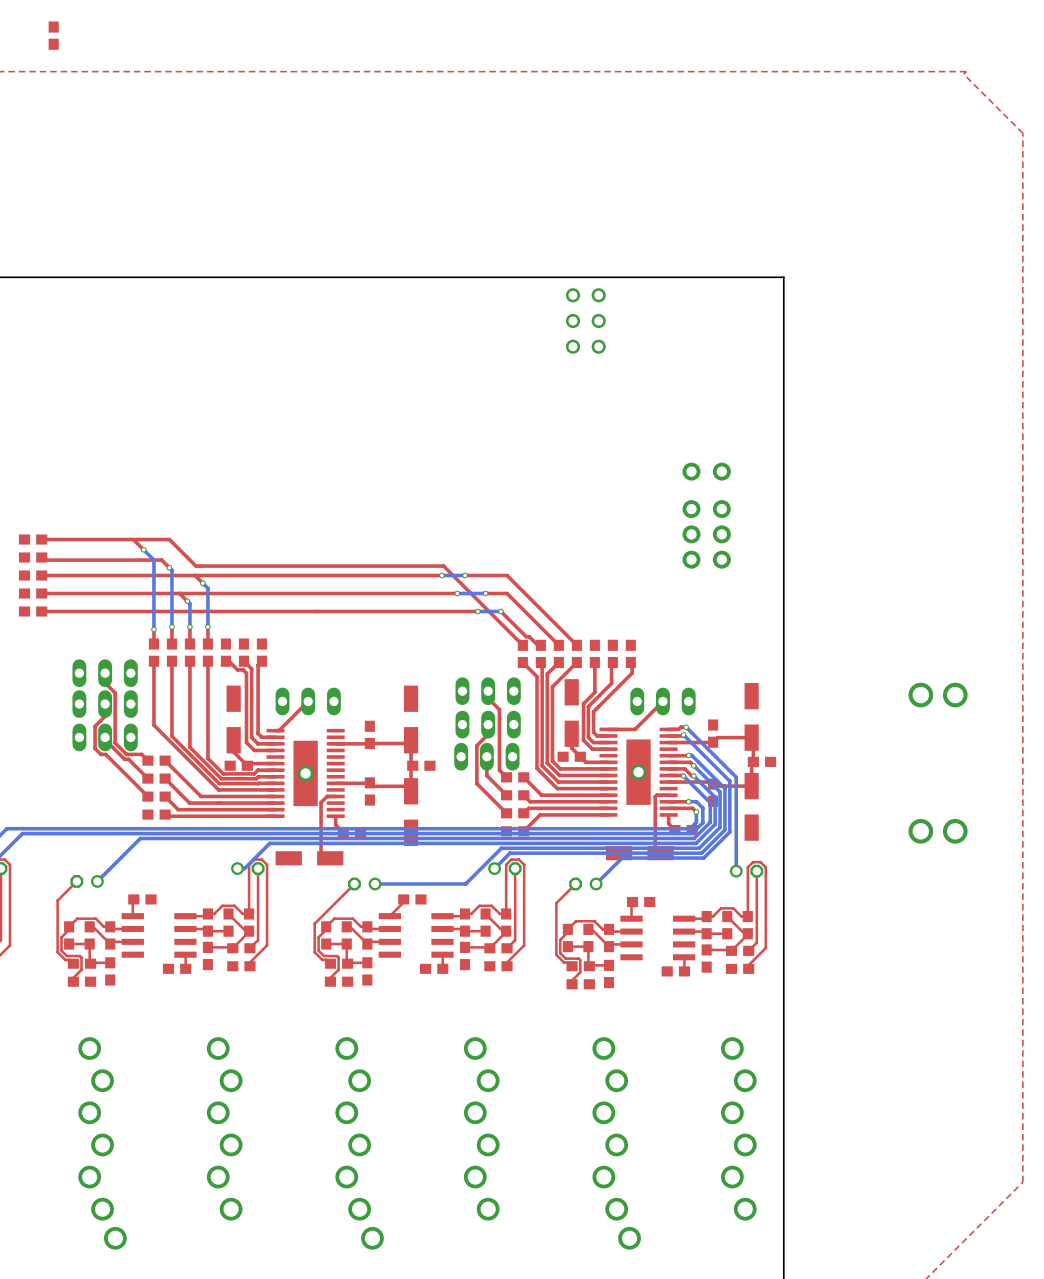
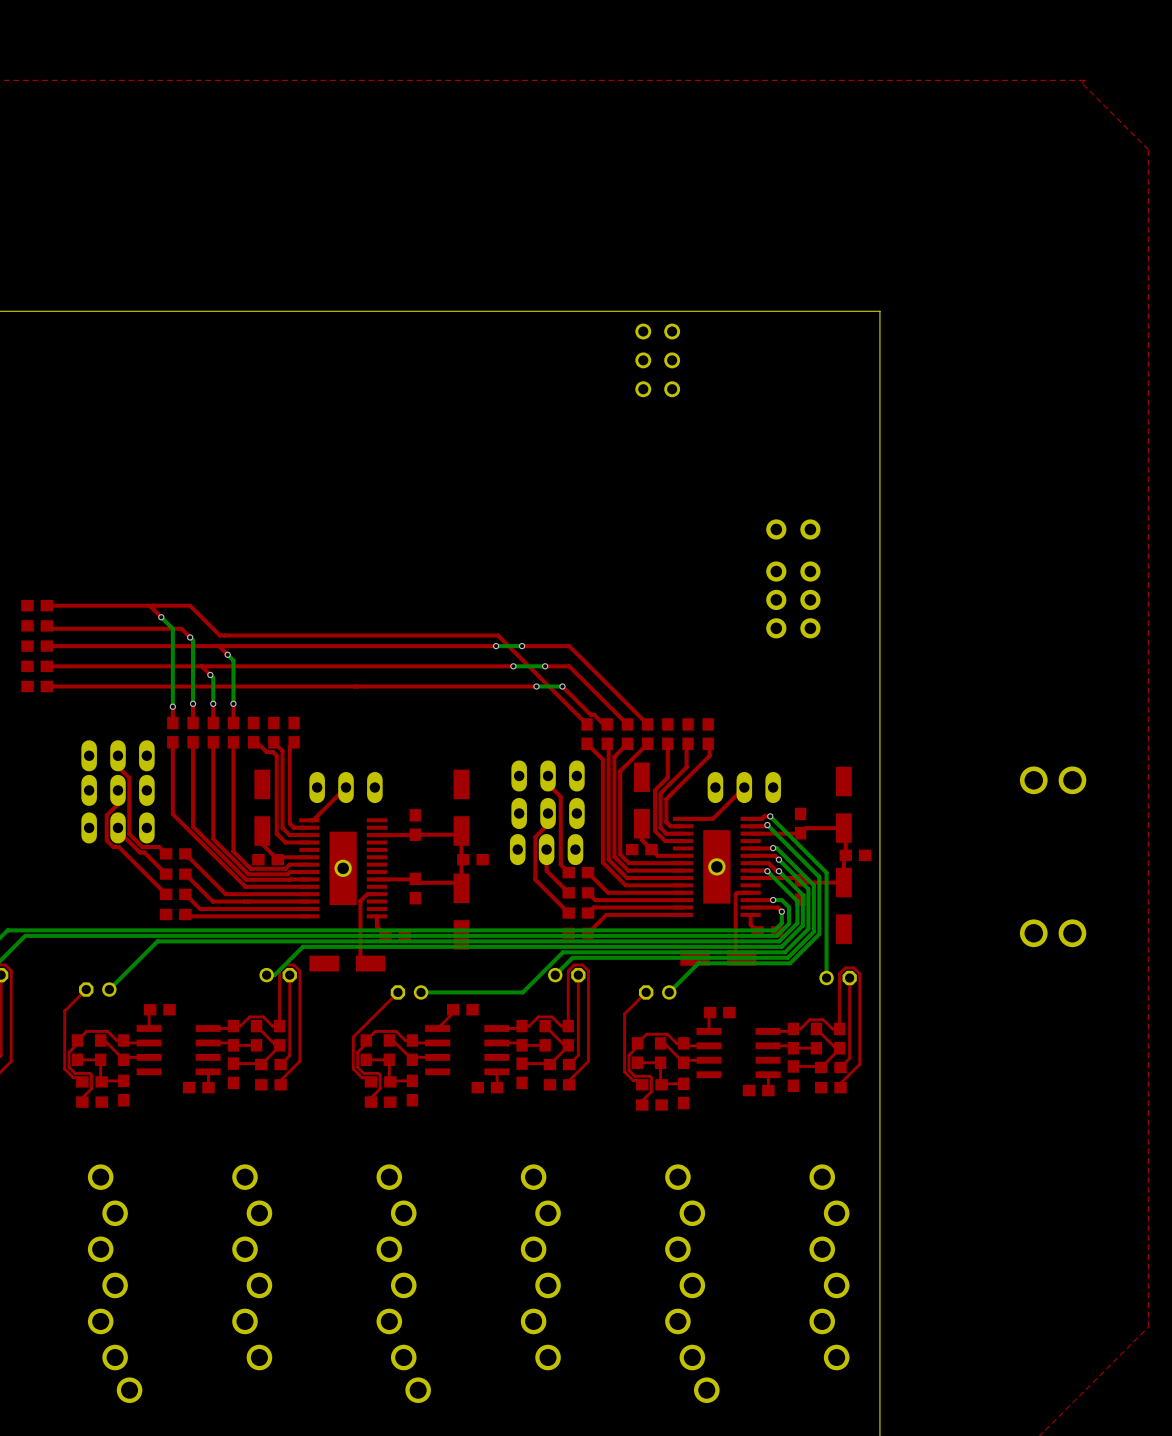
part: (53, 35) -> none

